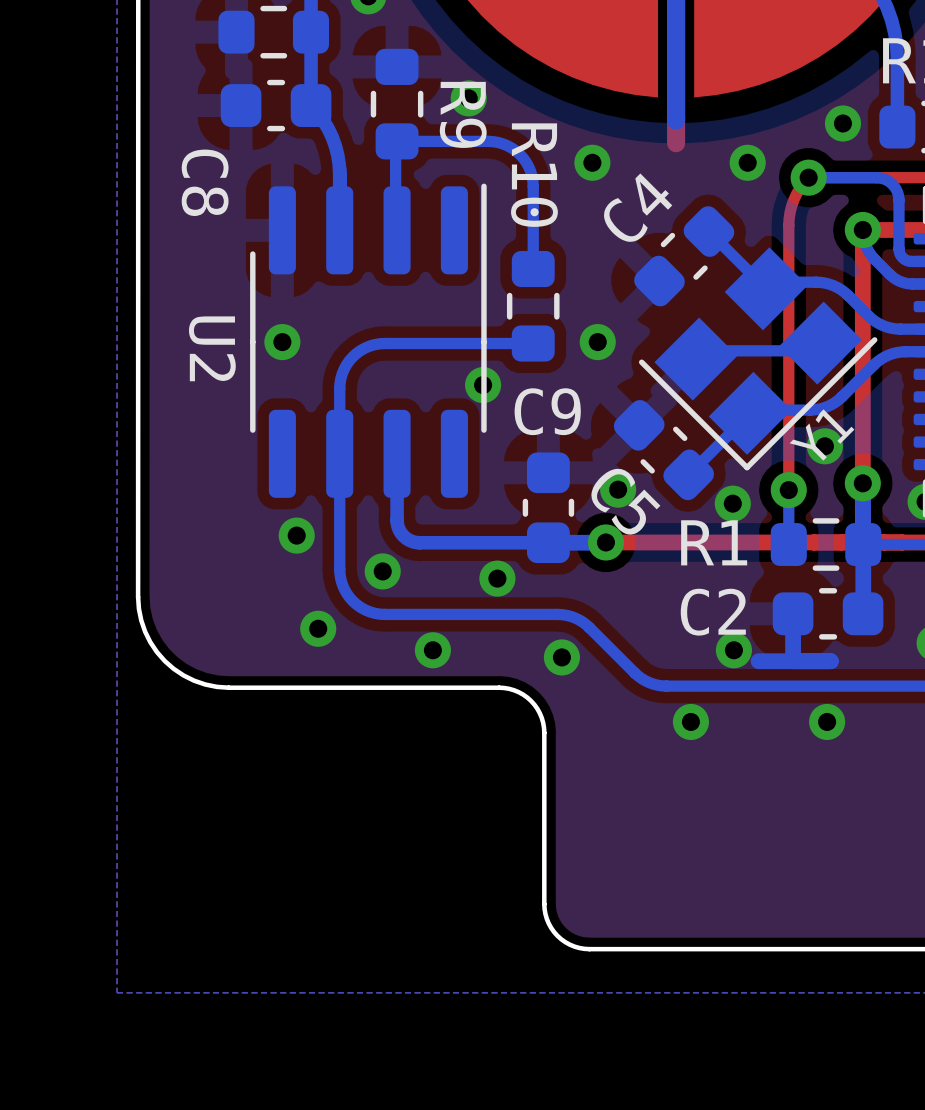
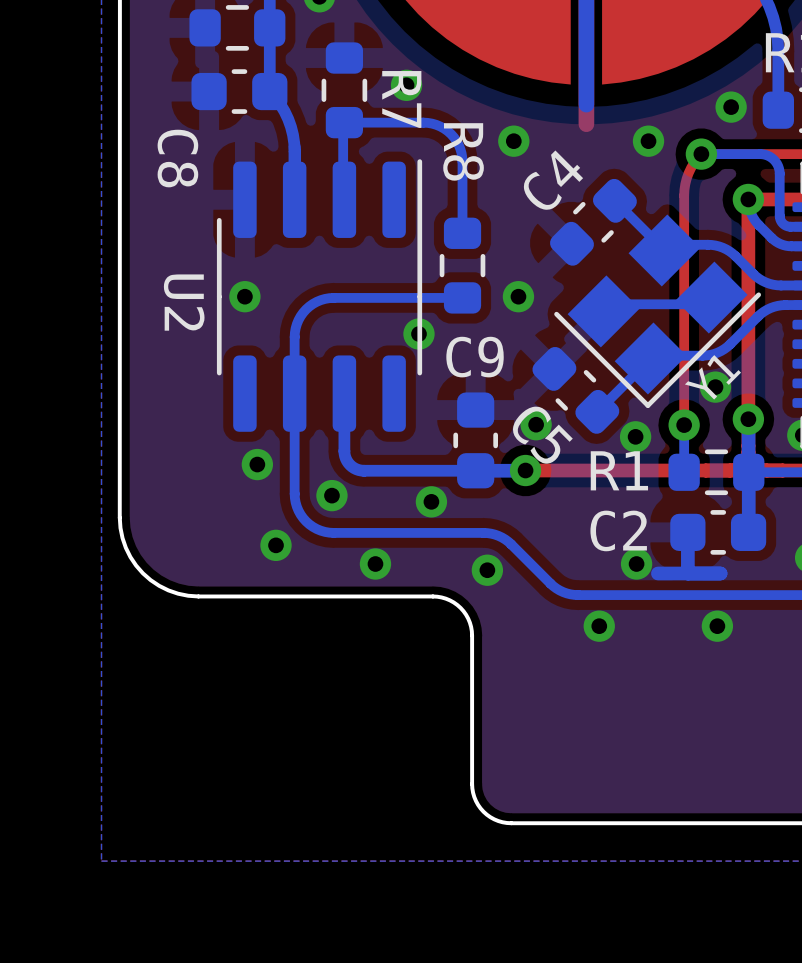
R9 name: R9 (463, 114) -> R7 (401, 99)
R10 name: R10 (534, 175) -> R8 (463, 151)

